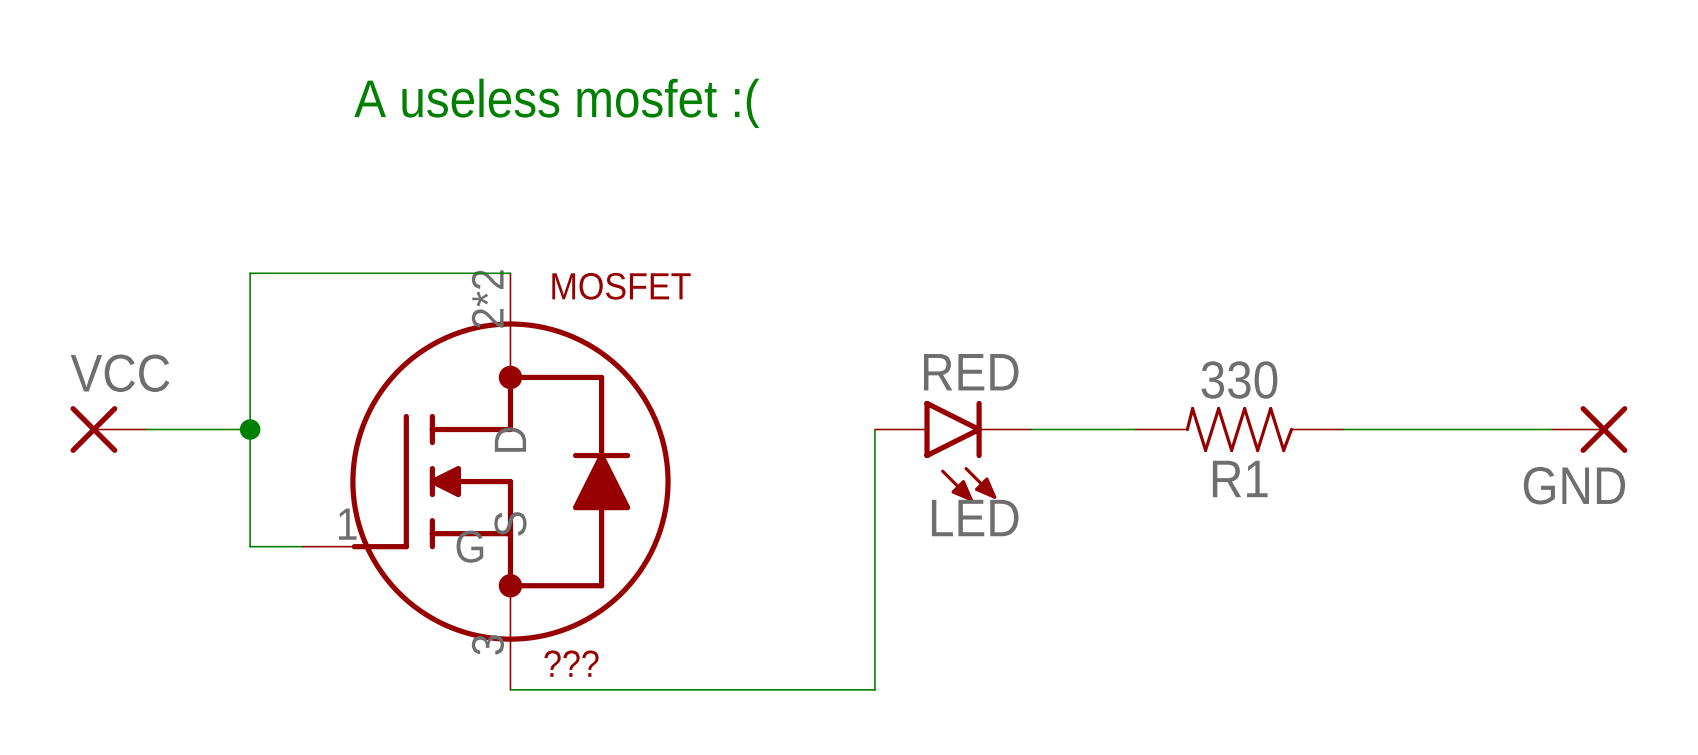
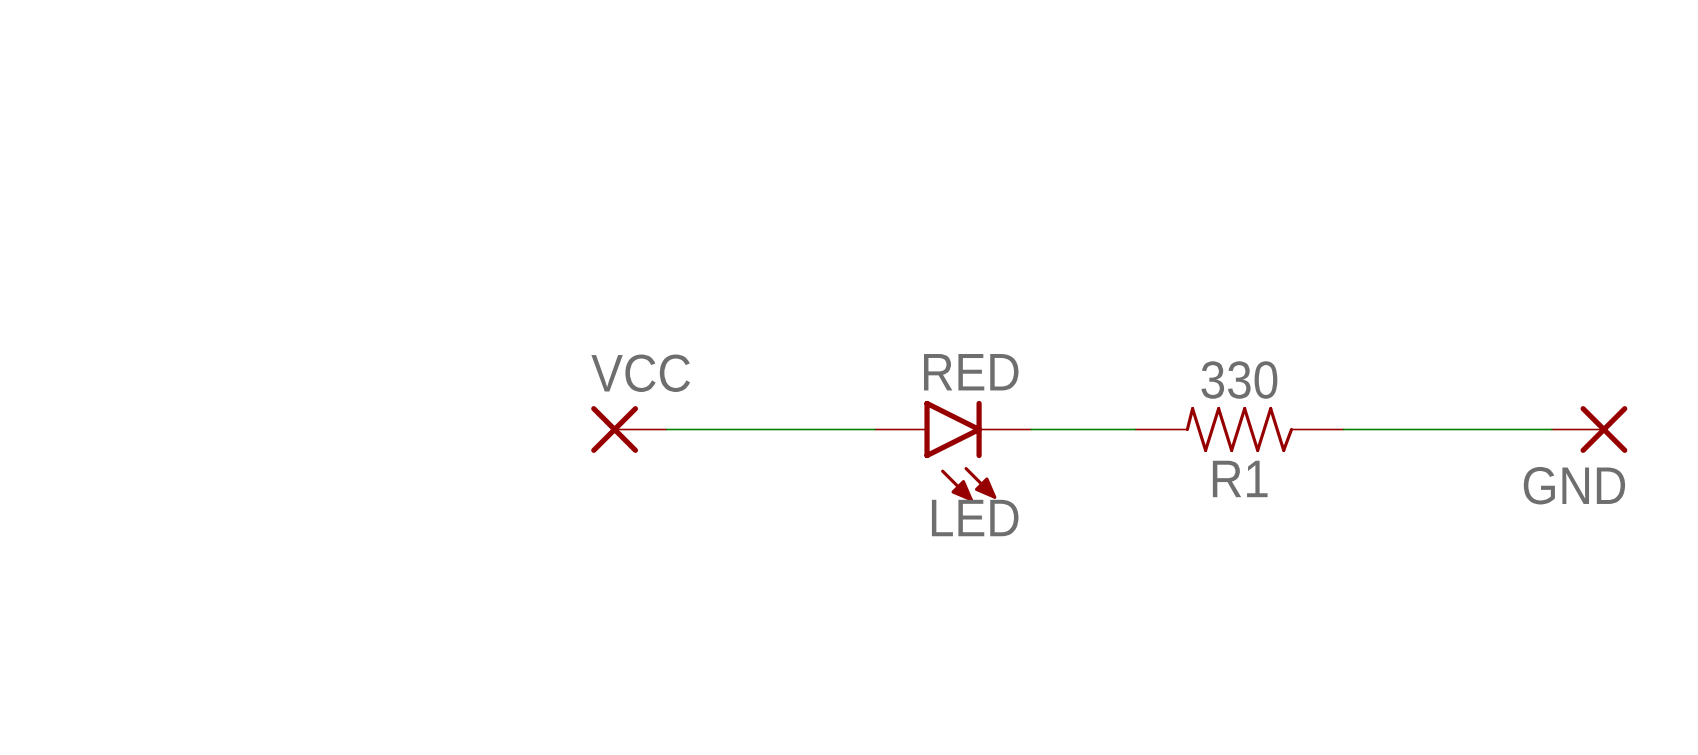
text: A useless mosfet :( (556, 103) -> none
wire: (510, 273) (250, 273) (250, 546) (302, 546) -> none
VCC: (108, 429) -> none
wire: (145, 429) (250, 429) -> none
junction: (250, 429) -> none
VCC: none -> (628, 429)
wire: (874, 429) (874, 689) (510, 689) -> (874, 429) (666, 429)
MOSFET: ??? (486, 481) -> none

